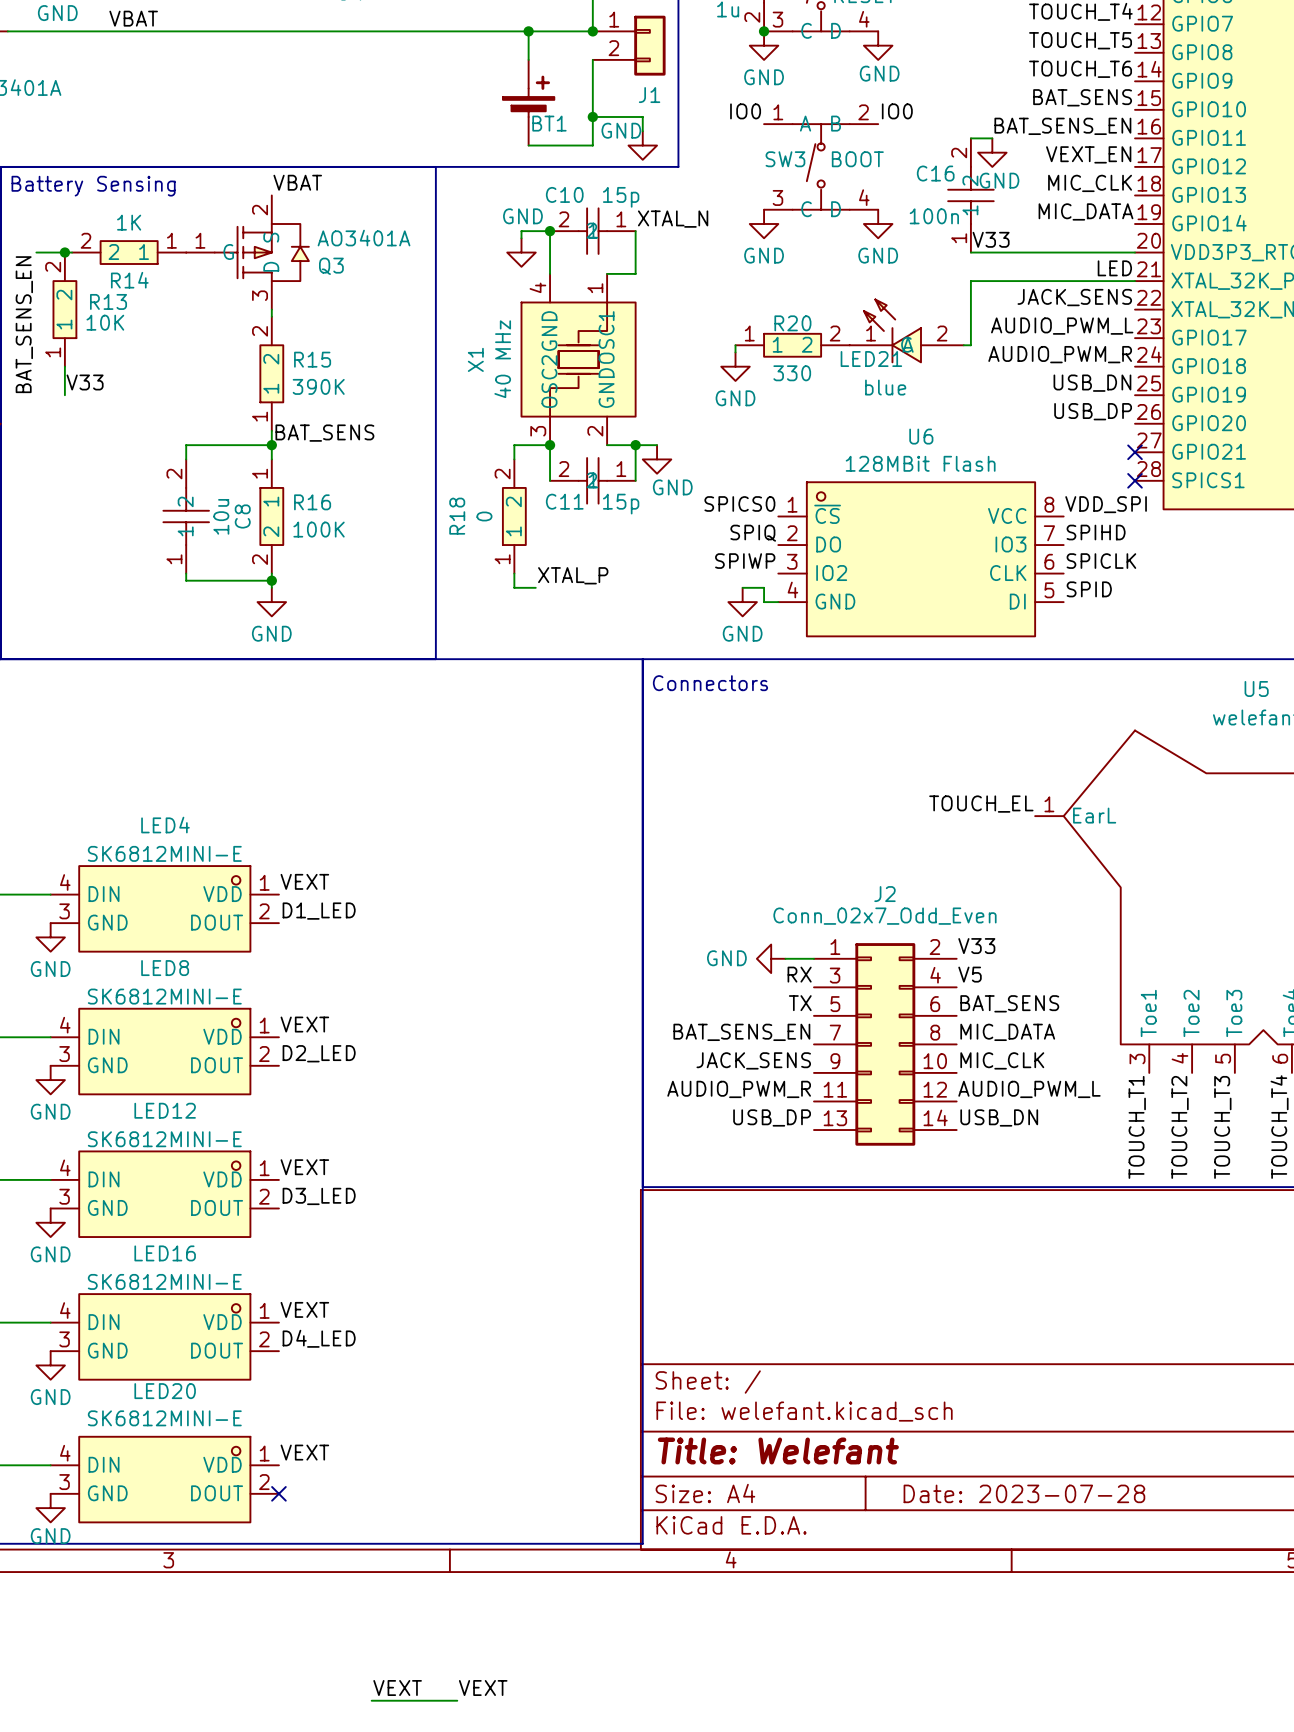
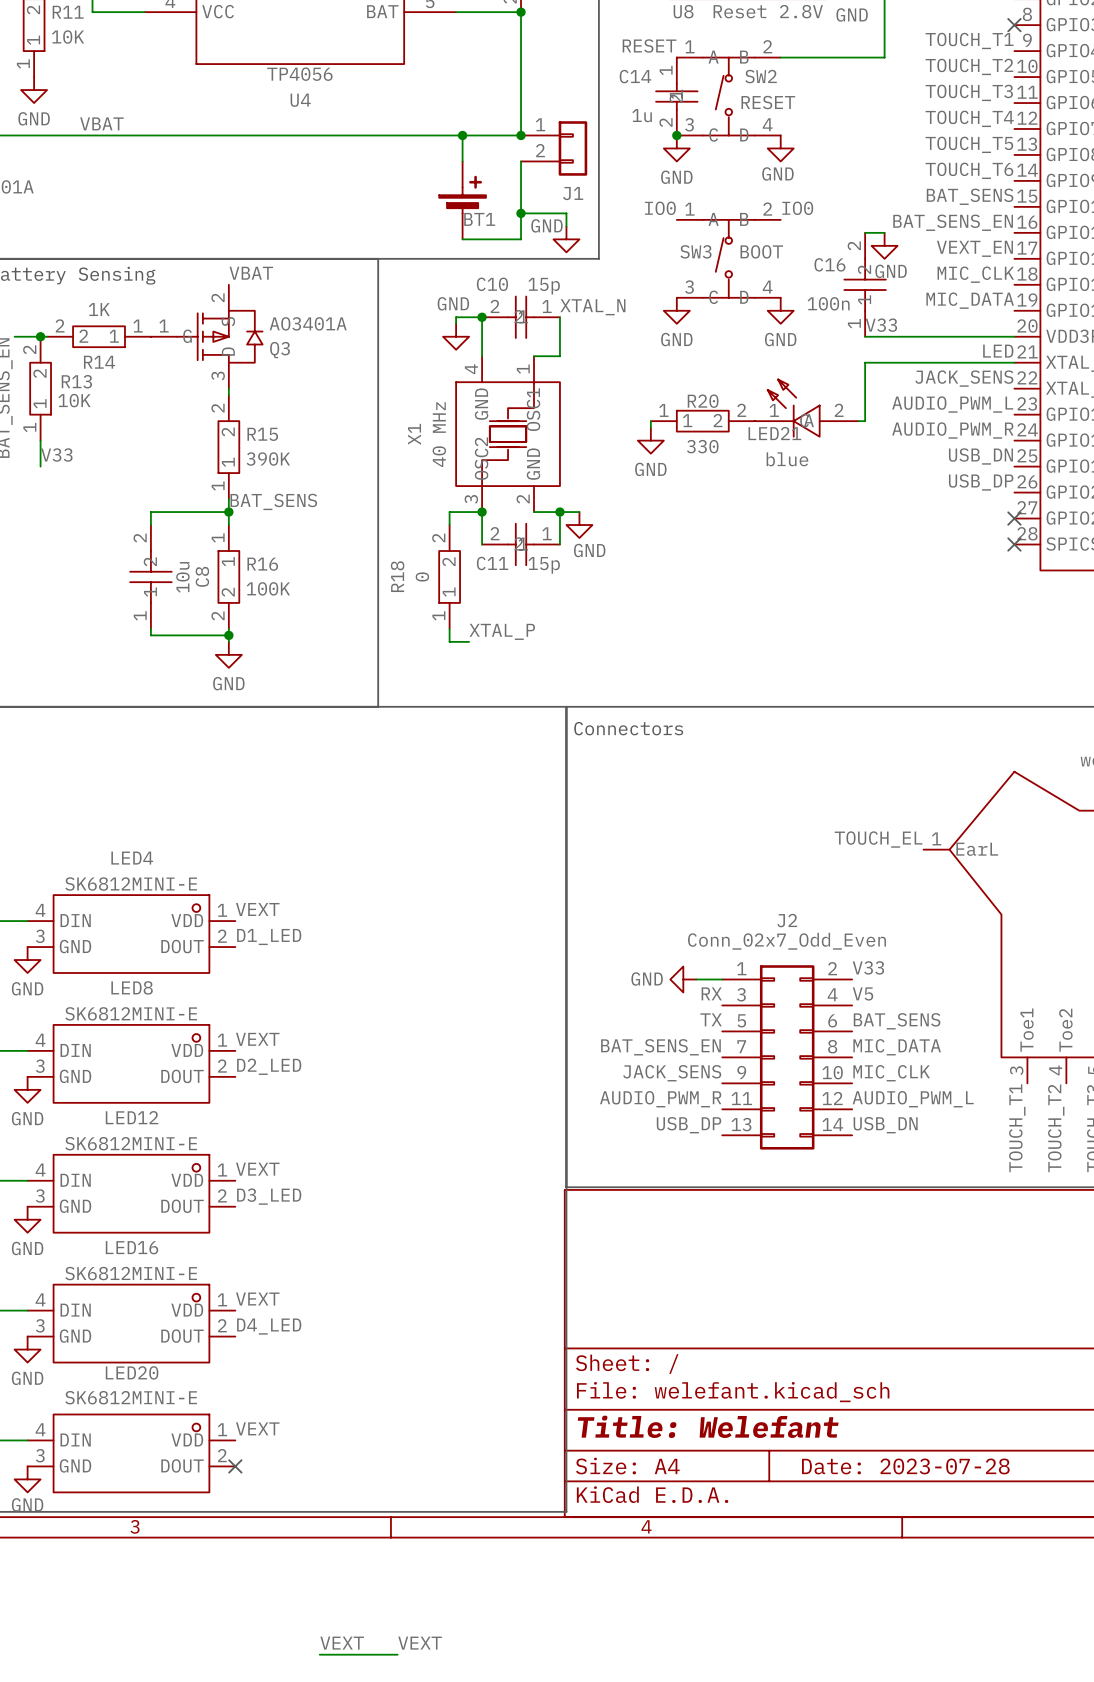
label: SPICS0 (739, 503) -> none
label: VDD_SPI (1106, 504) -> none
label: SPIHD (1096, 532) -> none
label: SPIQ (753, 533) -> none
U6: 128MBit Flash (920, 559) -> none
label: SPIWP (745, 561) -> none
label: SPICLK (1101, 561) -> none
wire: (742, 587) (764, 587) (764, 602) (778, 602) -> none
label: SPID (1089, 589) -> none
power symbol: GND (742, 602) -> none

